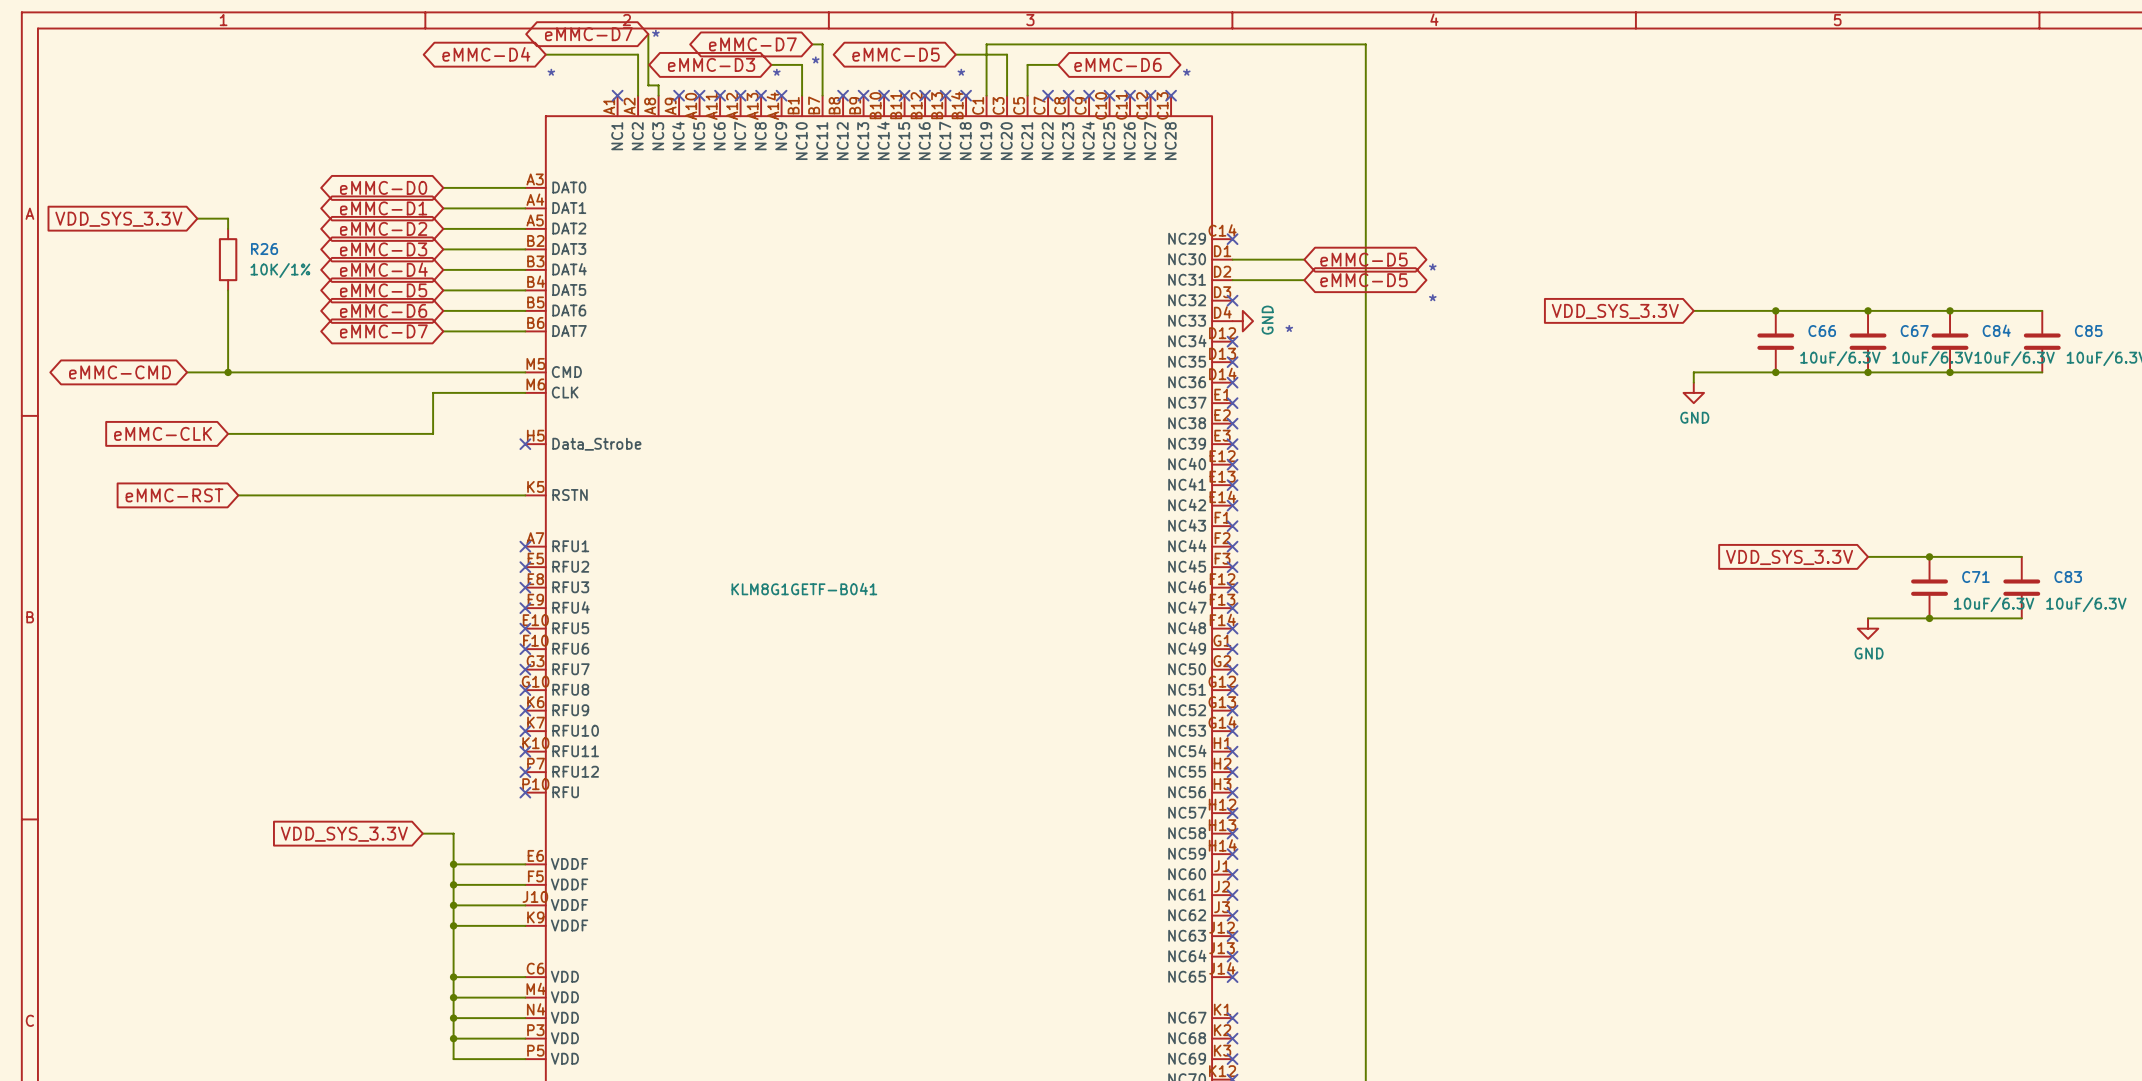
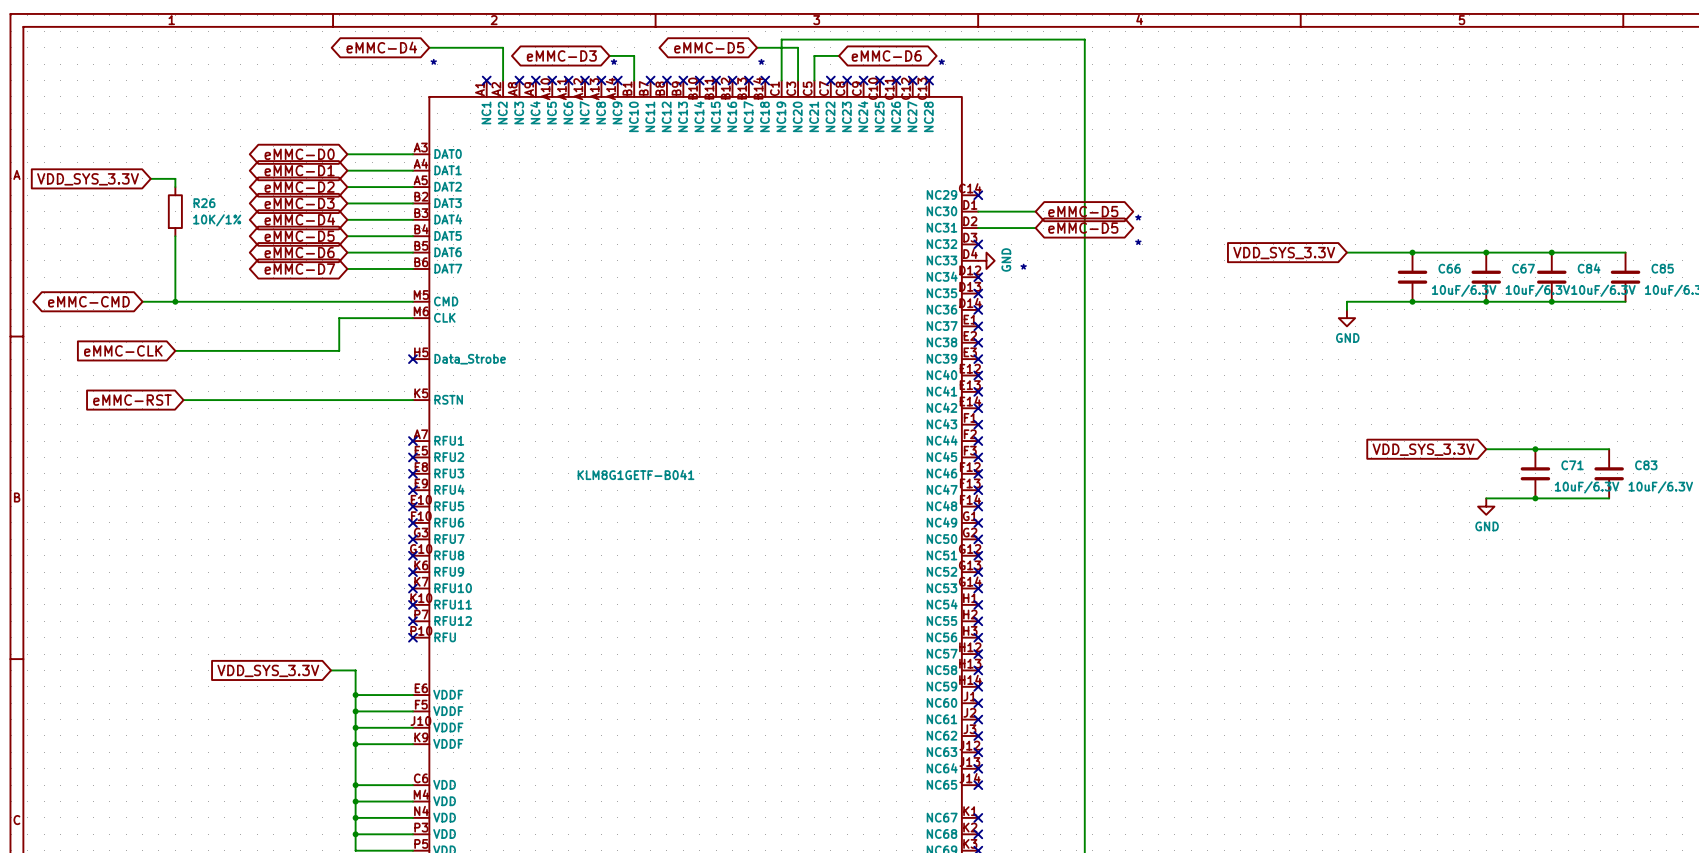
text: * (655, 33) -> none
global label: eMMC-D7 (588, 34) -> none
wire: (648, 34) (648, 85) (658, 85) (658, 95) -> none
global label: eMMC-D7 (752, 44) -> none
wire: (812, 44) (822, 44) (822, 95) -> none
text: * (815, 59) -> none
no-connect mark: none -> (519, 80)
no-connect mark: none -> (650, 80)

